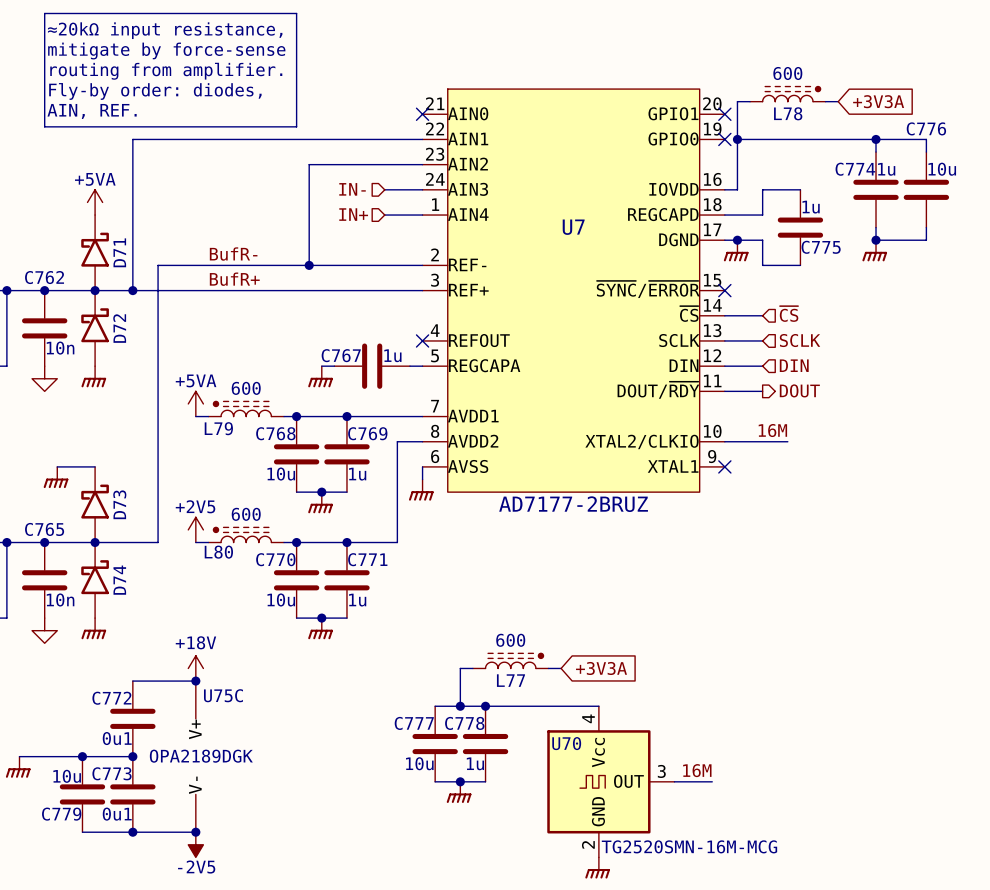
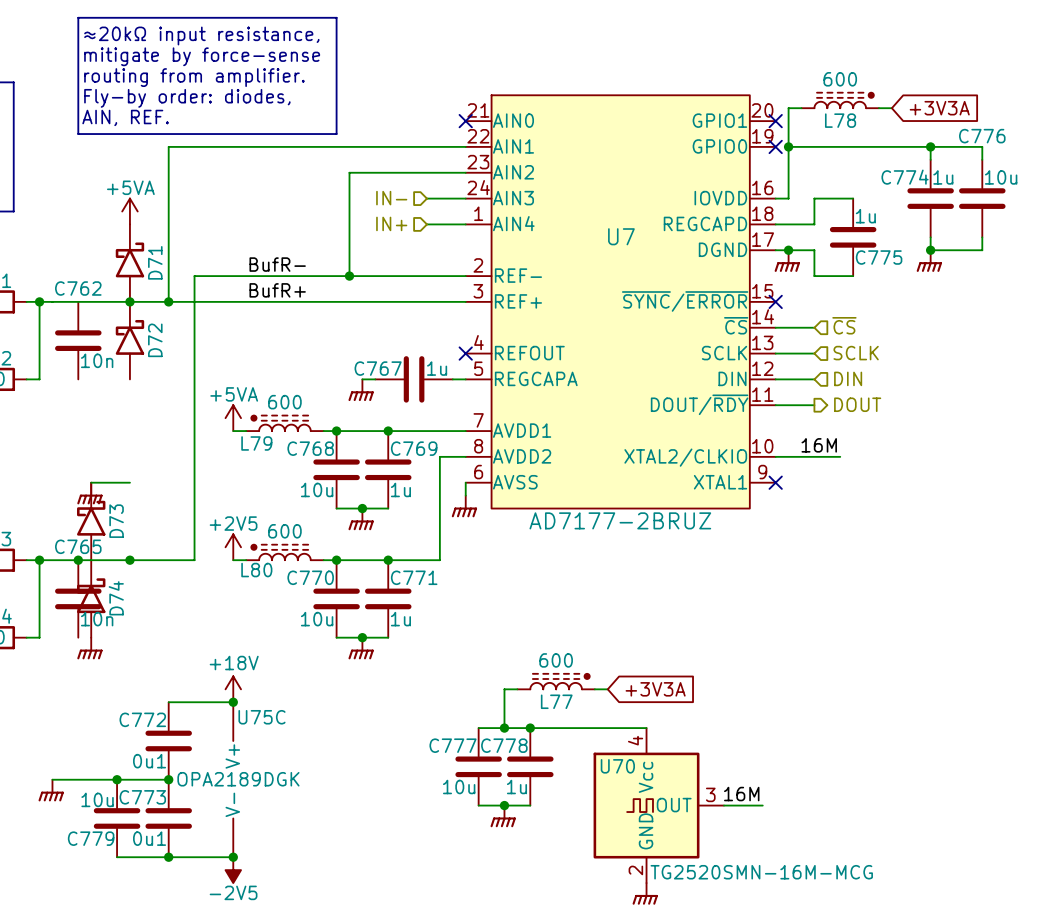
junction: (44, 290) -> none
power symbol: (93, 376) -> none
power symbol: (44, 378) -> none
D73 position: (95, 504) -> (91, 521)
D74 position: (95, 580) -> (91, 598)
power symbol position: (93, 628) -> (89, 648)
power symbol: (44, 630) -> none

